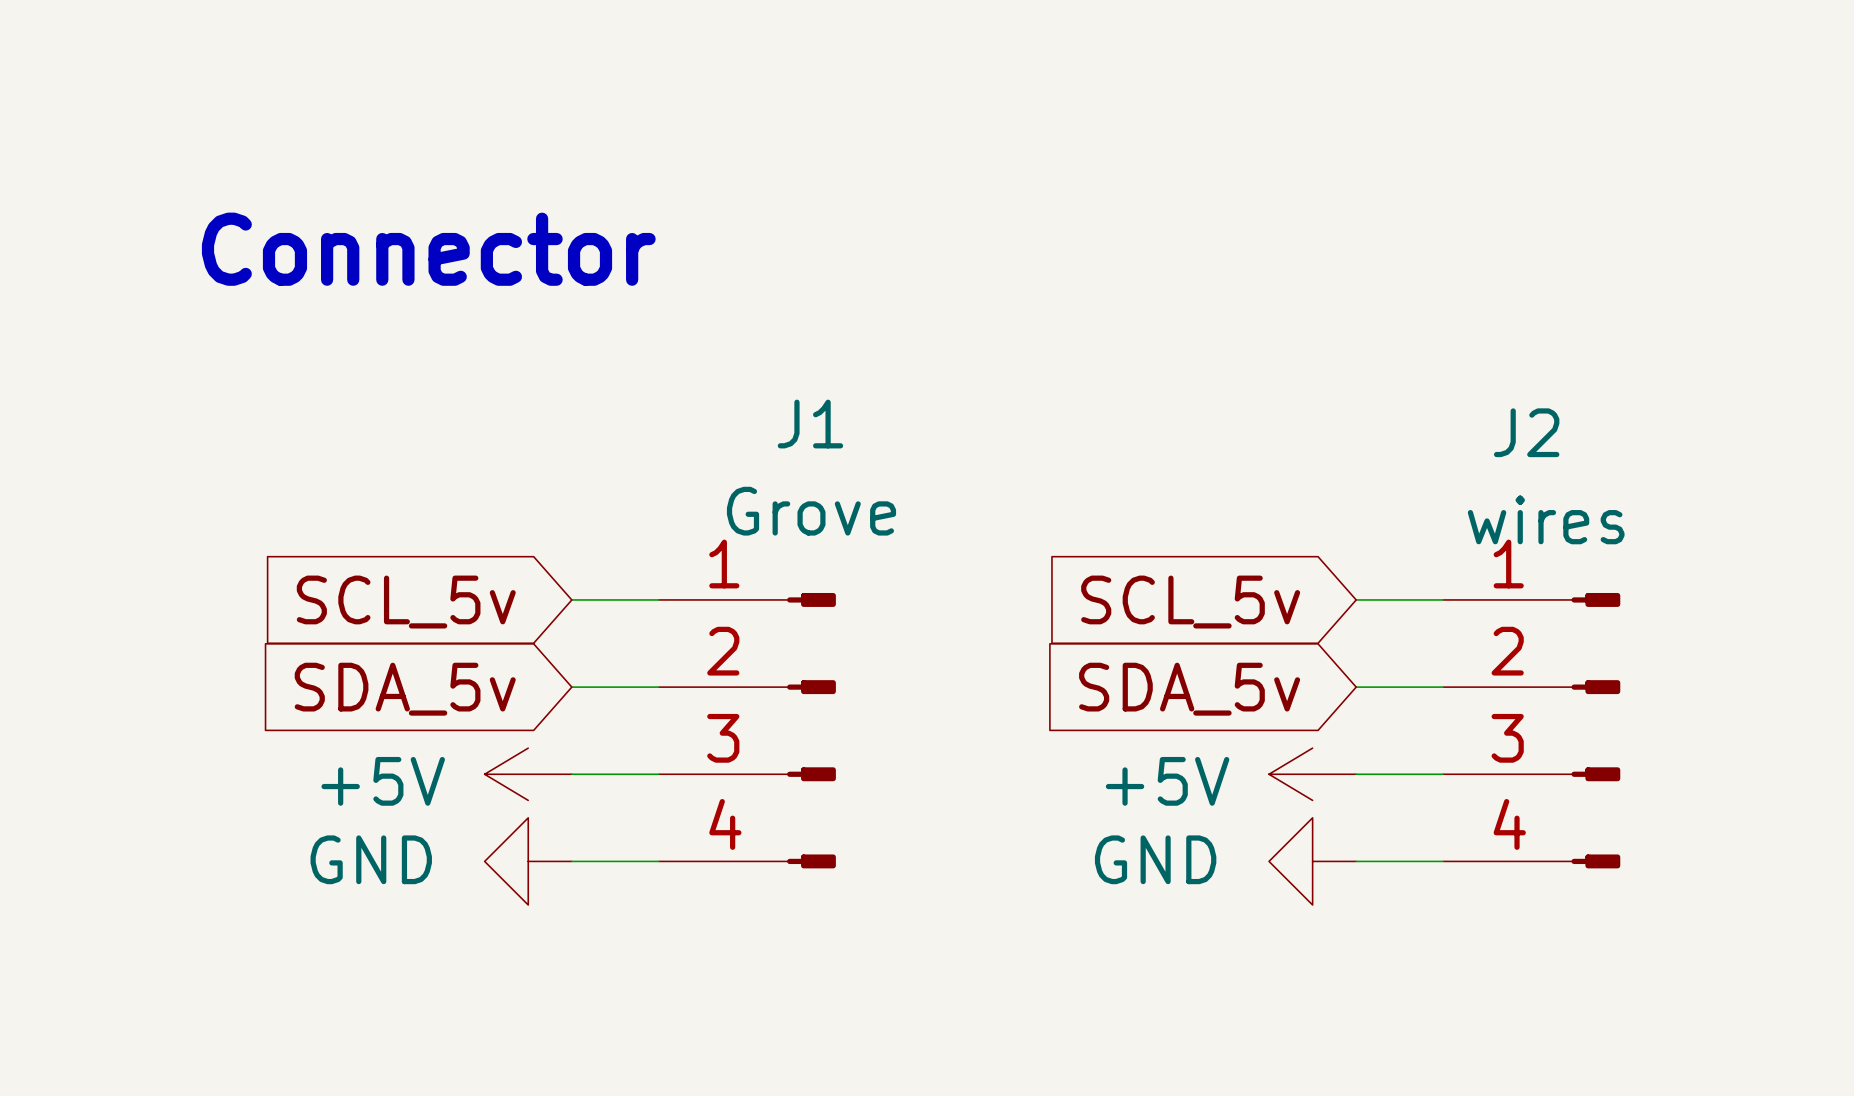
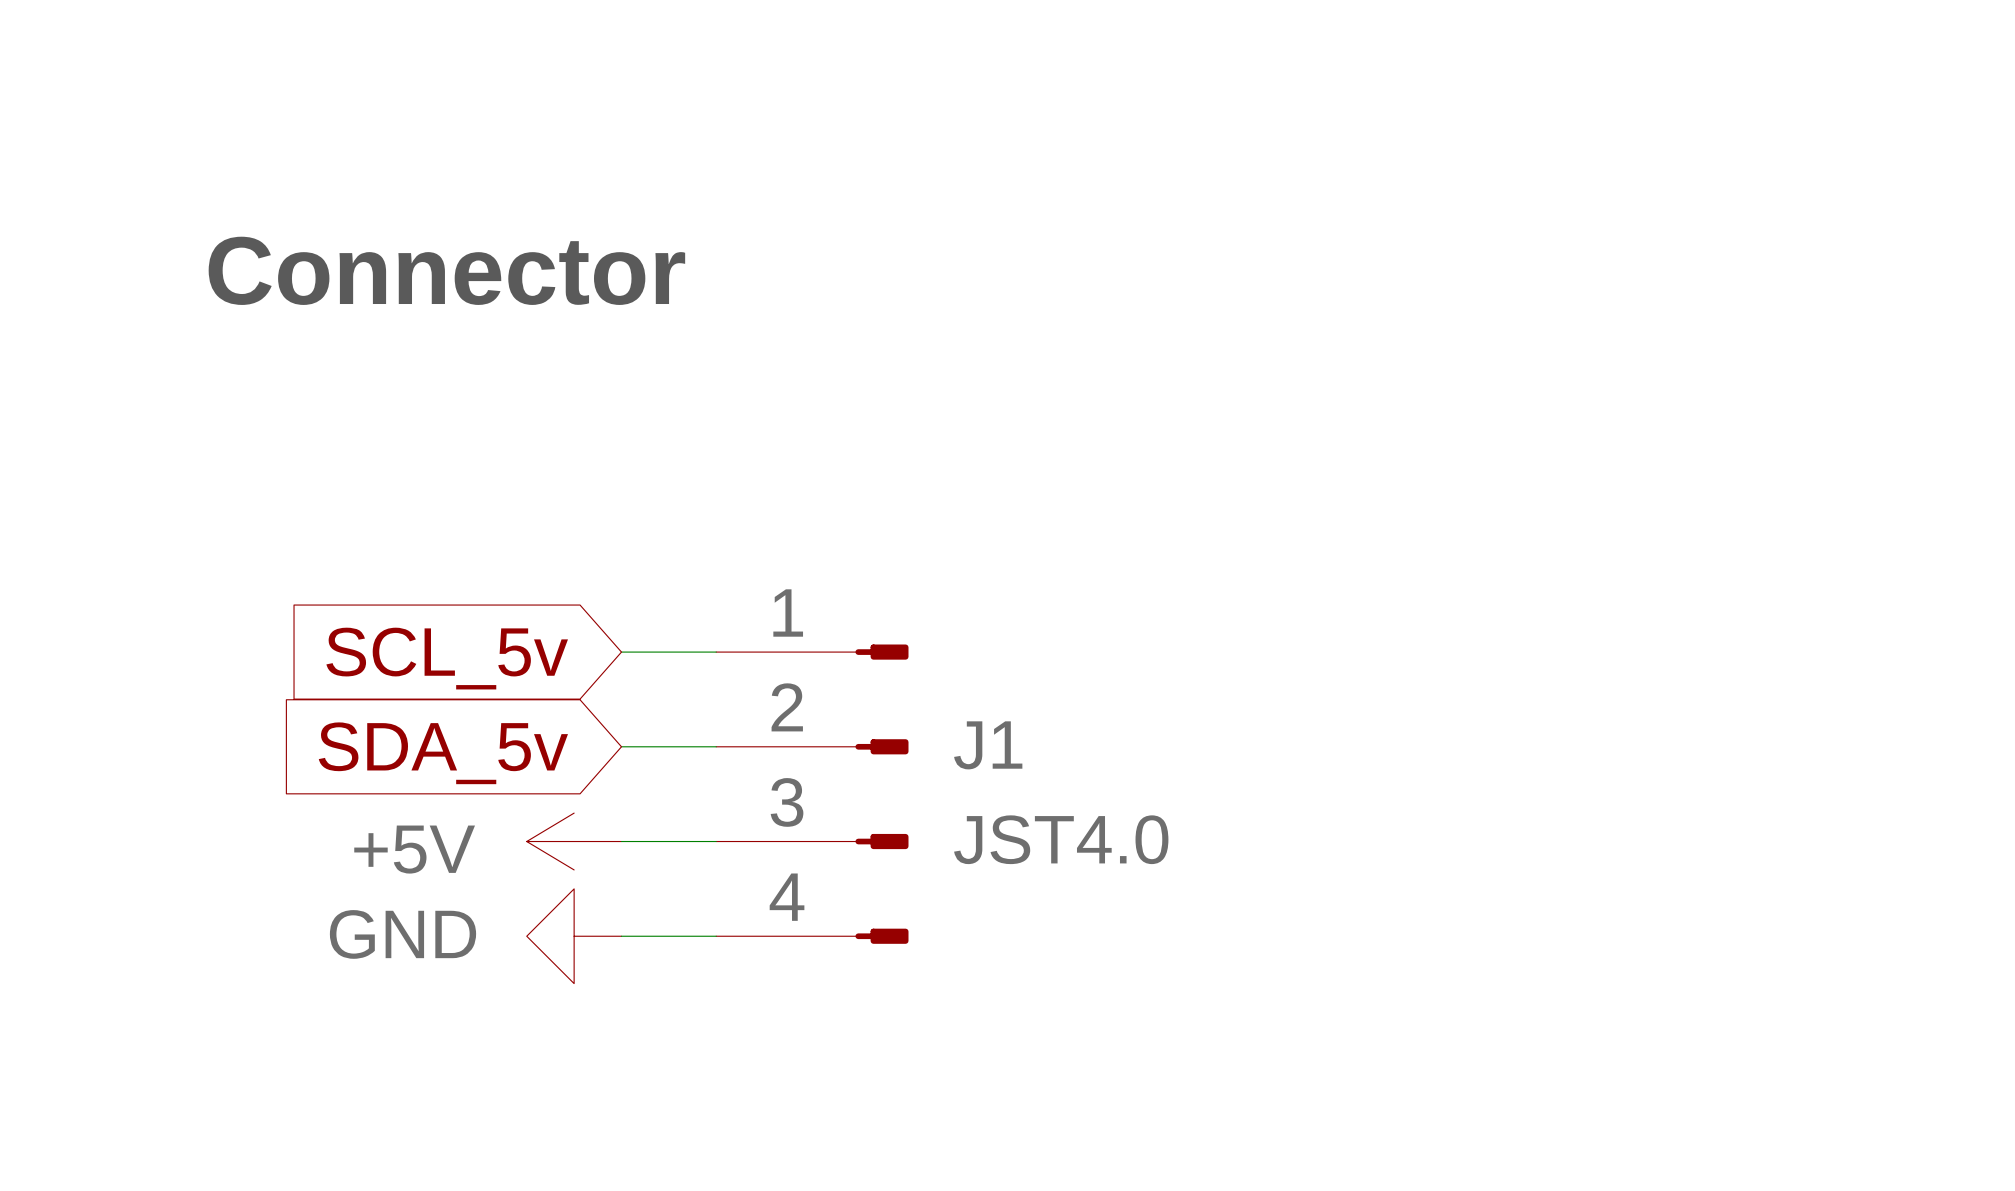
J1 name position: J1 (810, 424) -> J1 (988, 745)
J1 value: Grove (811, 511) -> JST4.0 (1061, 839)
wire: (1356, 599) (1443, 599) -> none
global label: SCL_5v (1190, 602) -> none
wire: (1356, 687) (1443, 687) -> none
global label: SDA_5v (1189, 689) -> none
J2: wires (1531, 730) -> none
power symbol: +5V (1312, 774) -> none
wire: (1356, 774) (1443, 774) -> none
power symbol: GND (1312, 861) -> none
wire: (1356, 861) (1443, 861) -> none

